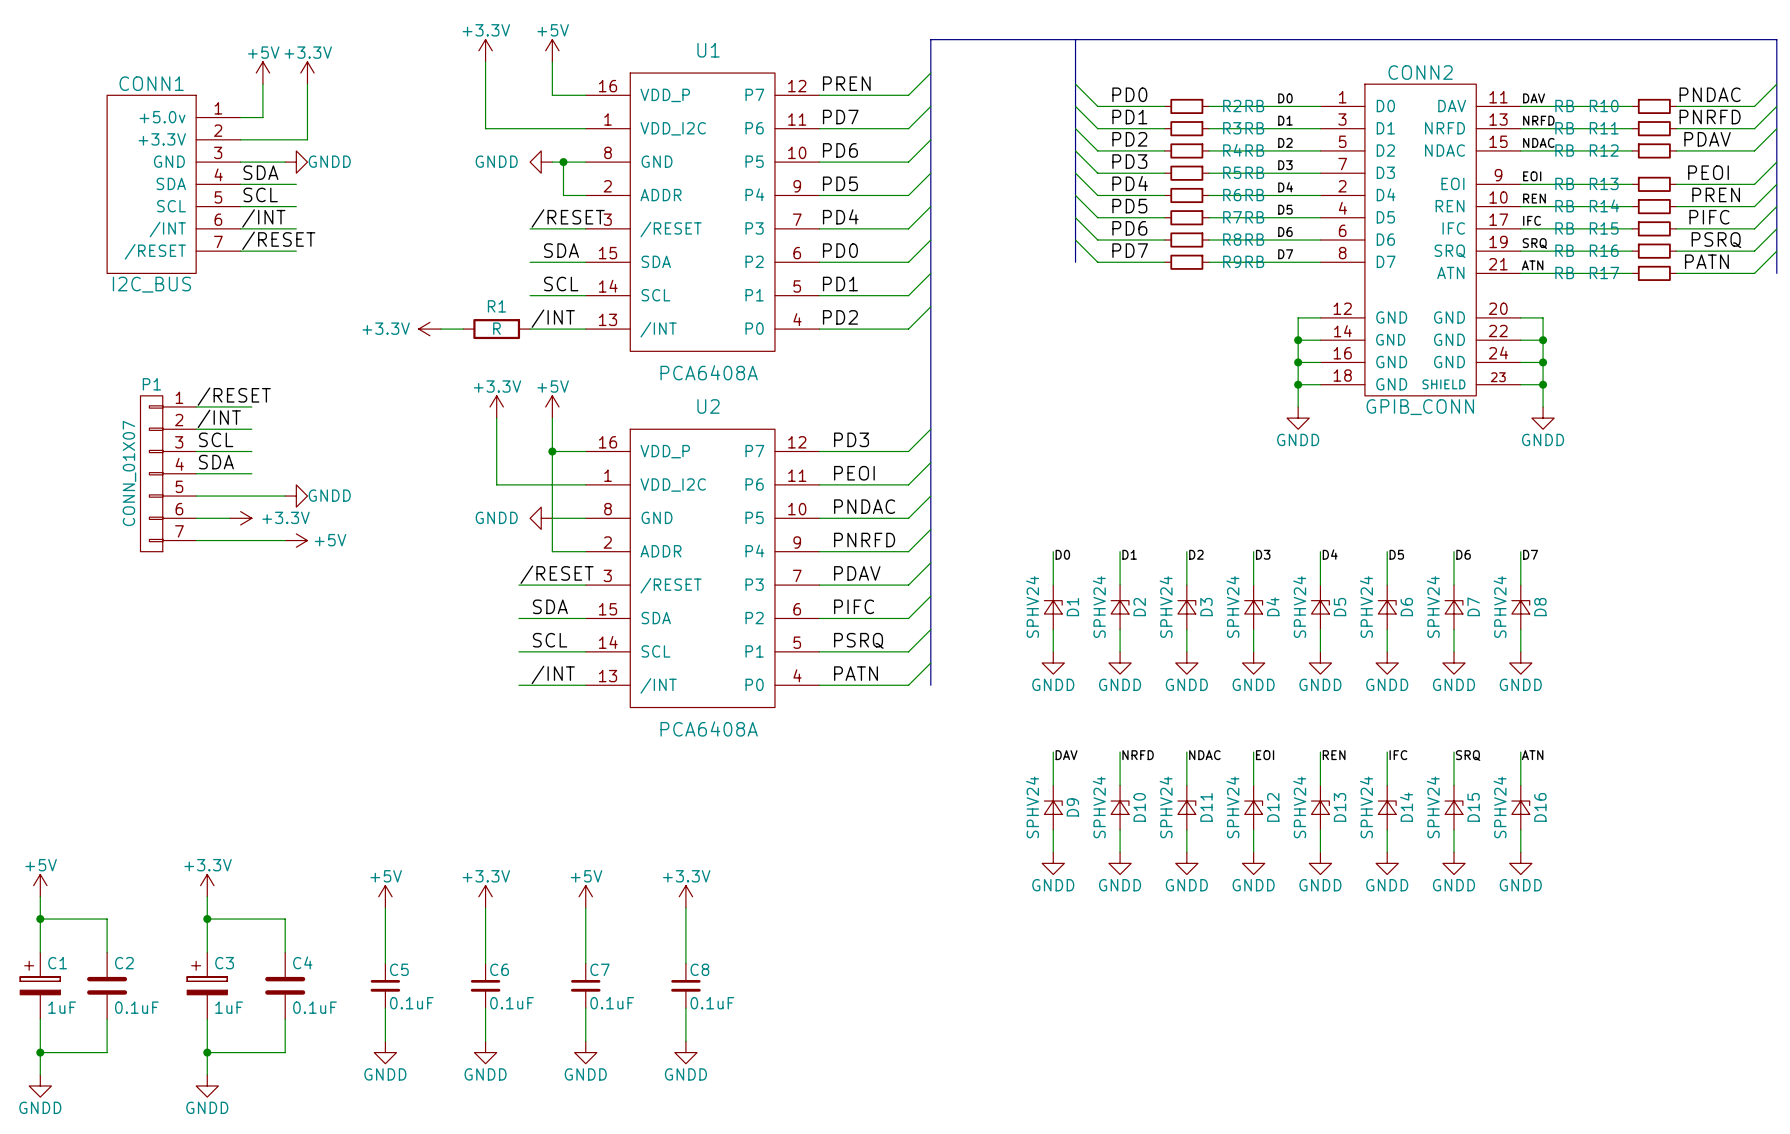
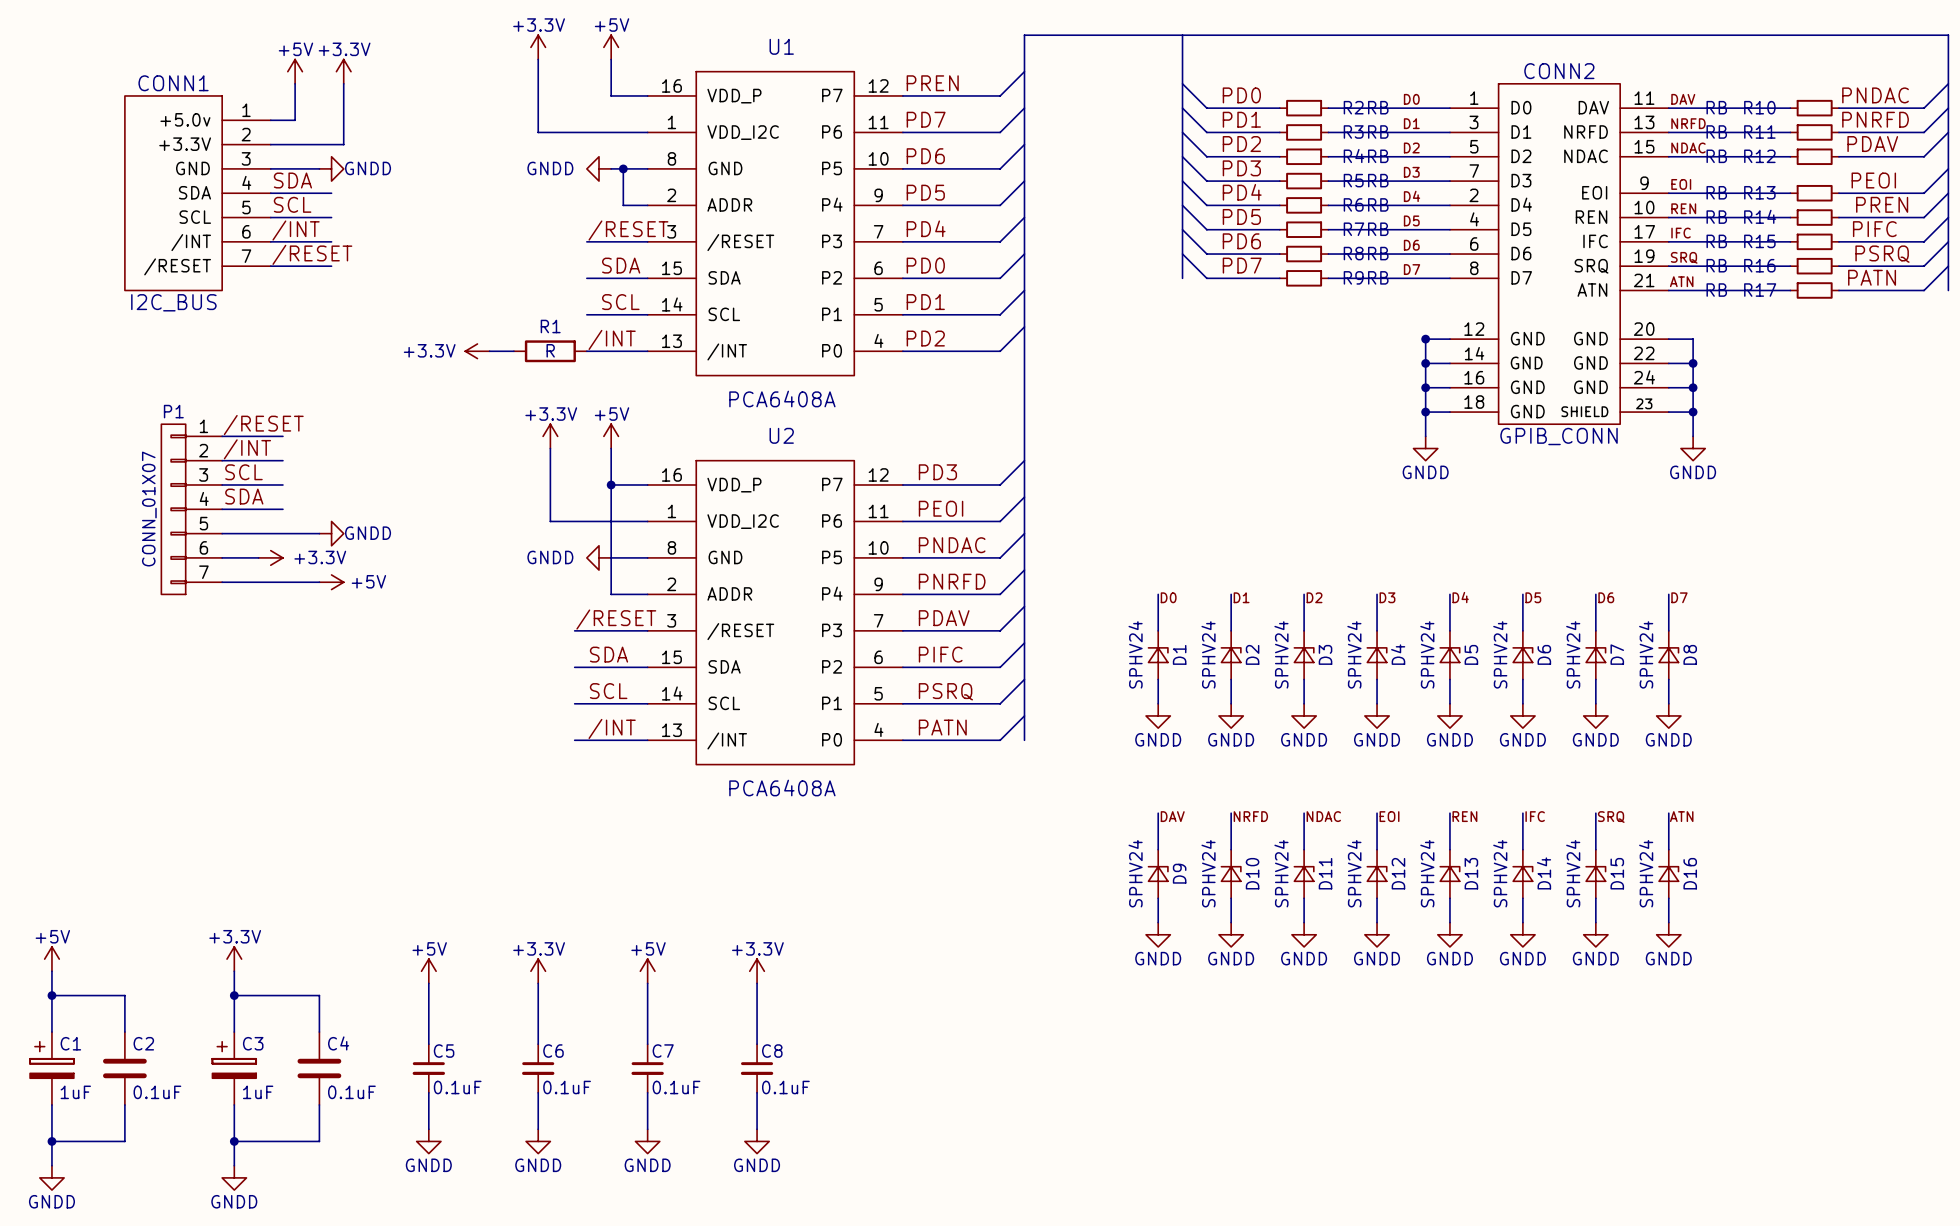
junction: none -> (1425, 339)

